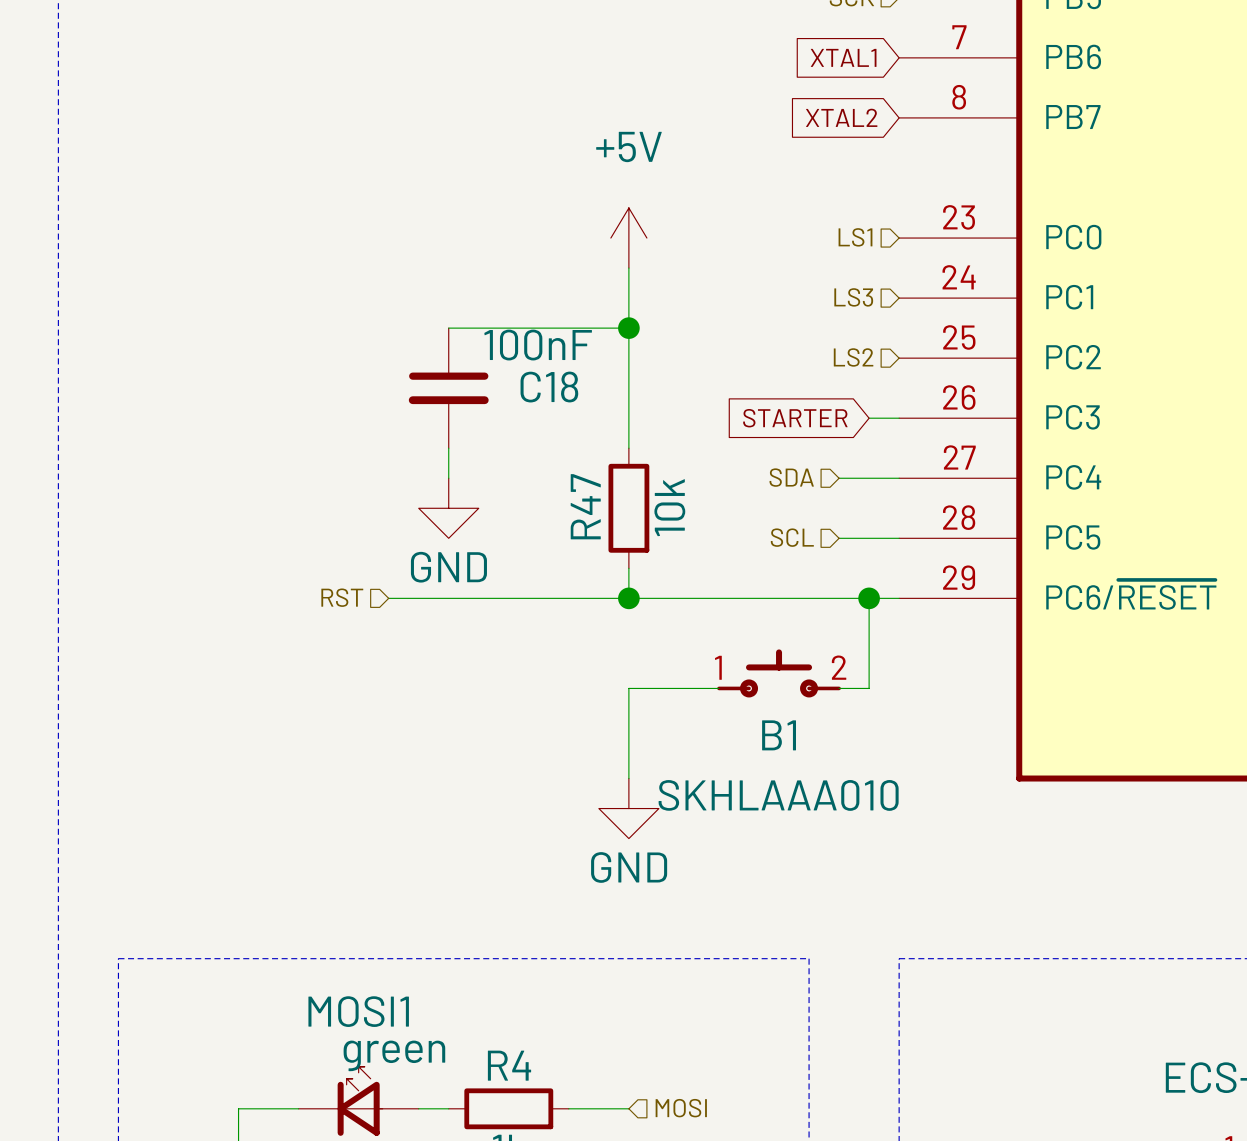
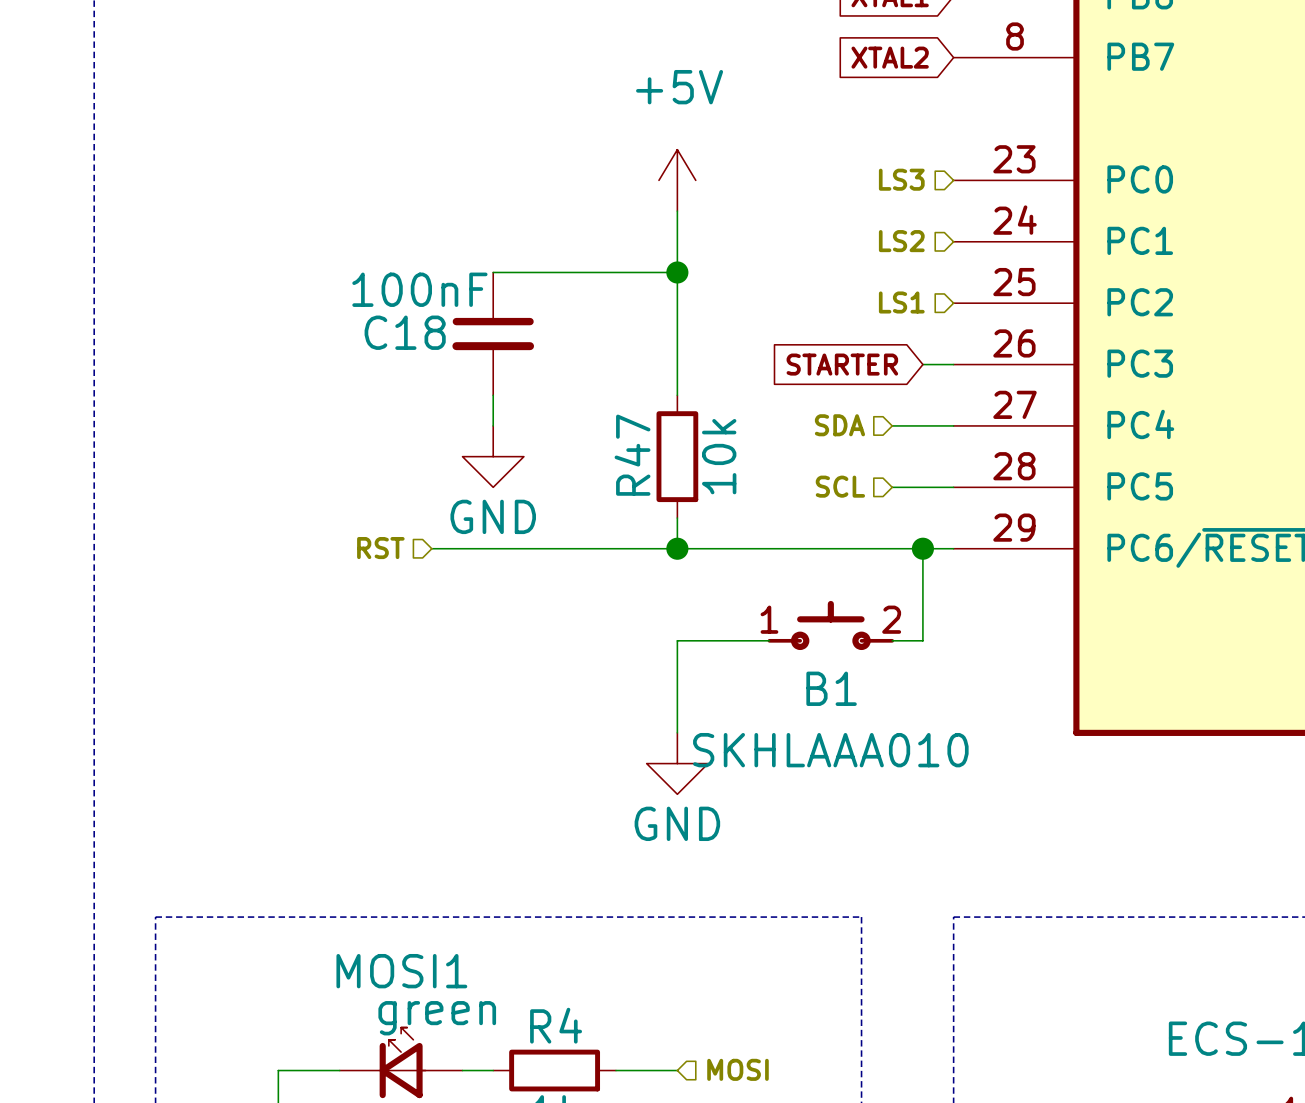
hierarchical label: LS1 (855, 237) -> LS3 (901, 179)
hierarchical label: LS3 (853, 297) -> LS2 (901, 241)
C18 value position: 100nF (538, 345) -> 100nF (419, 289)
hierarchical label: LS2 (853, 357) -> LS1 (901, 302)
C18 name position: C18 (549, 387) -> C18 (405, 332)

